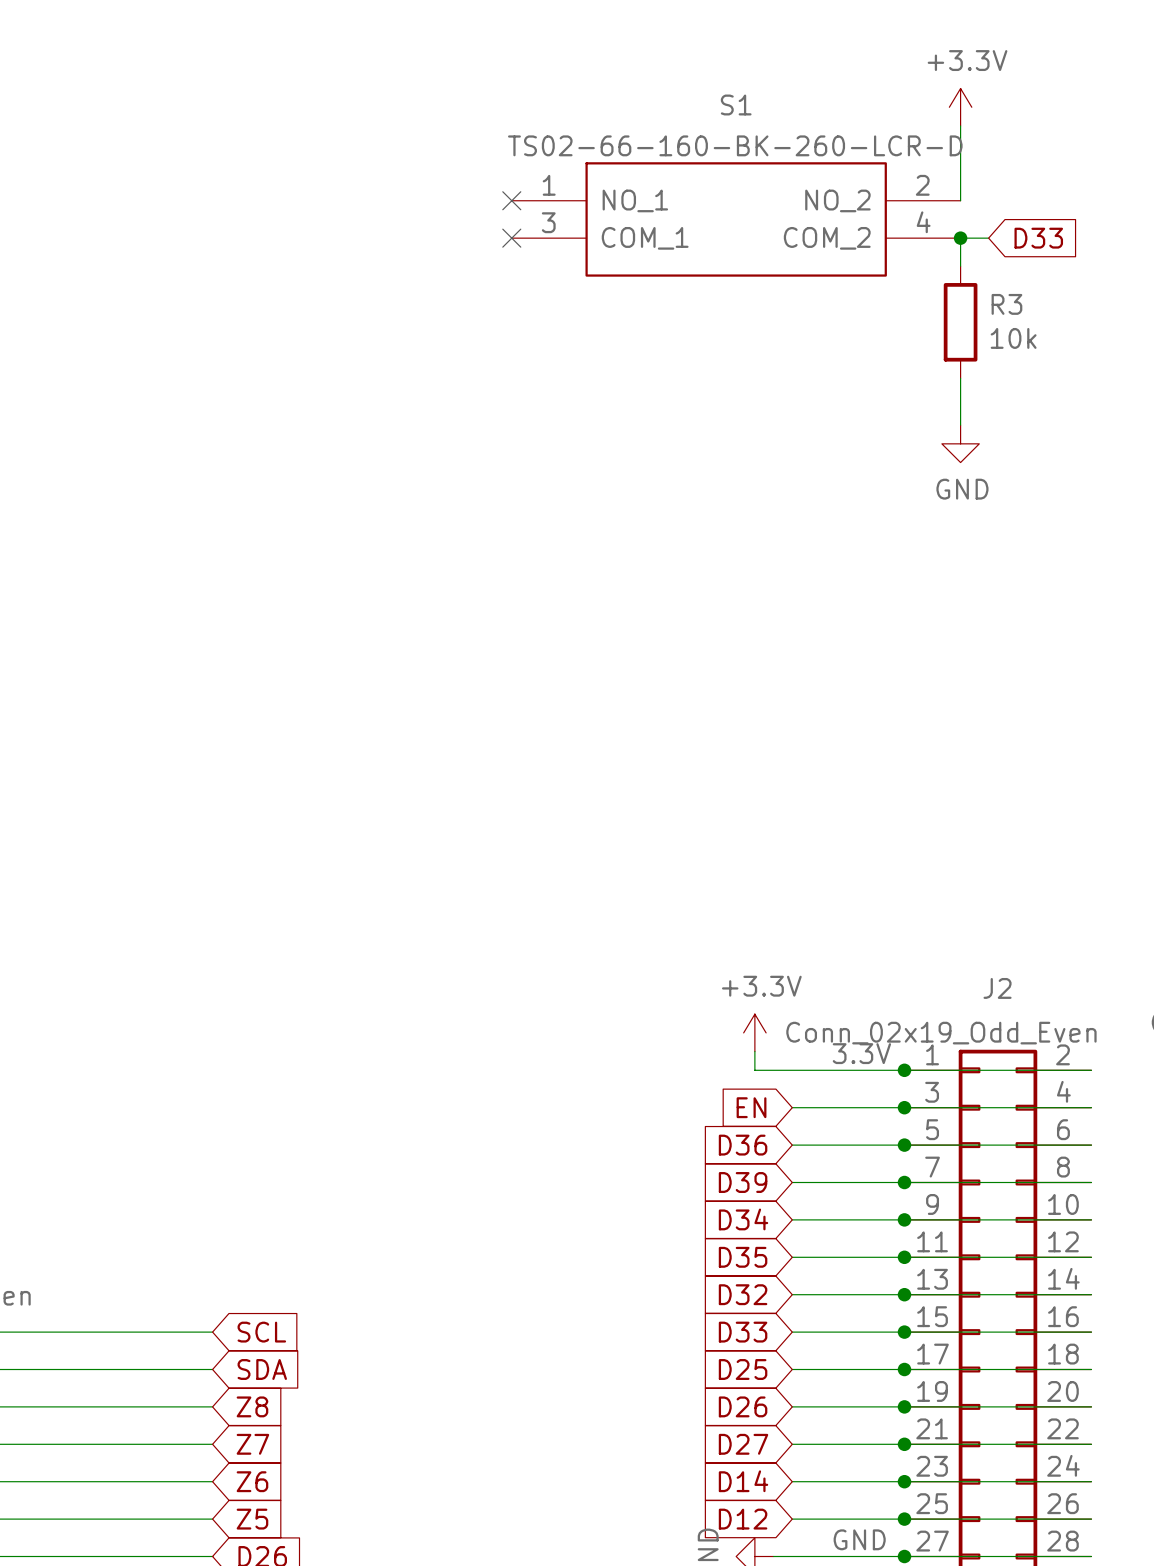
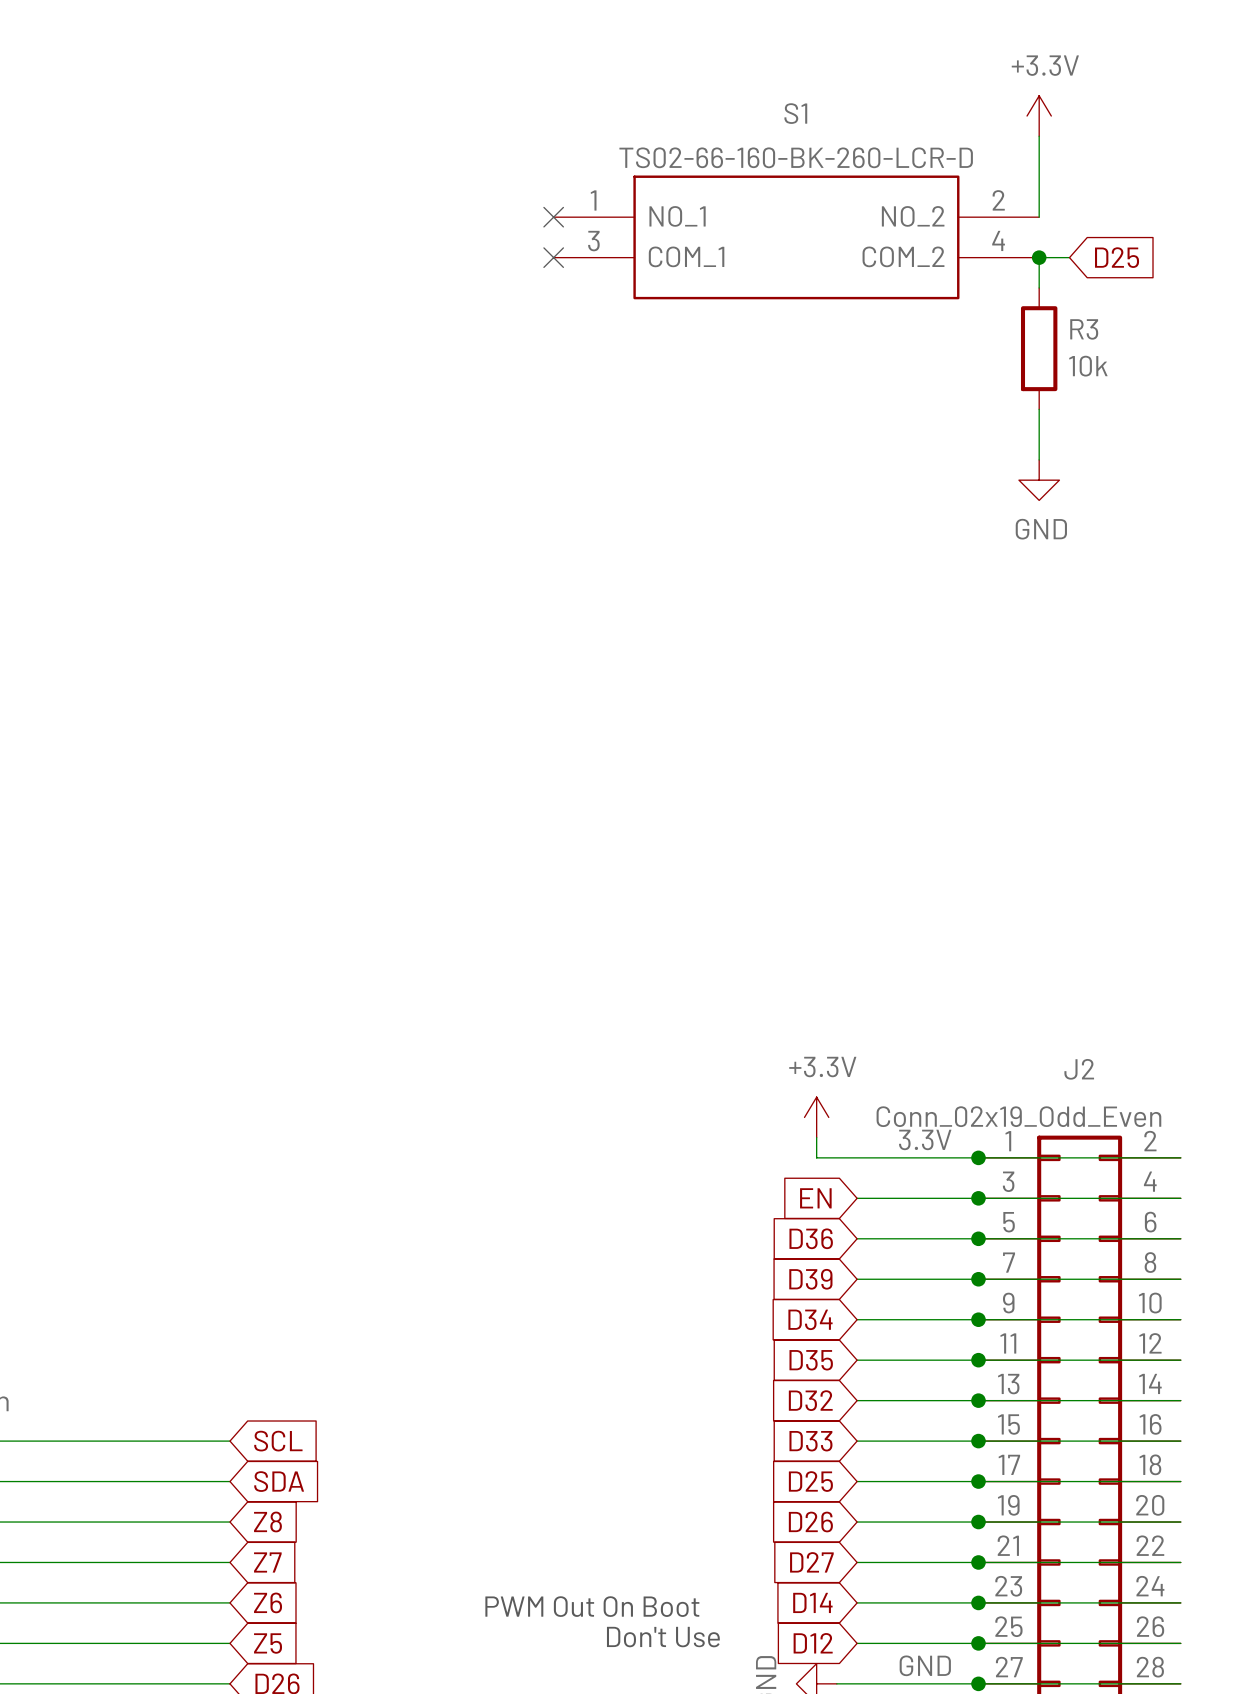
global label: D33 (1038, 238) -> D25 (1117, 257)
text: none -> PWM Out On Boot (592, 1606)
text: none -> Don't Use (663, 1637)

